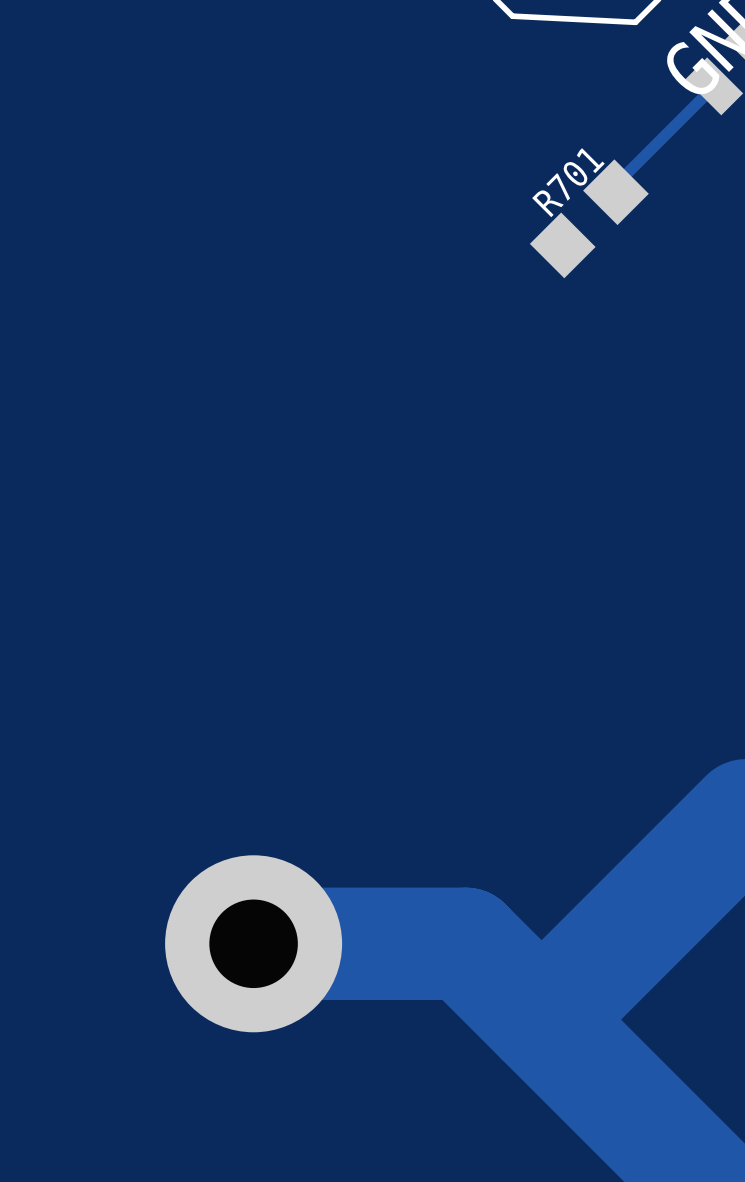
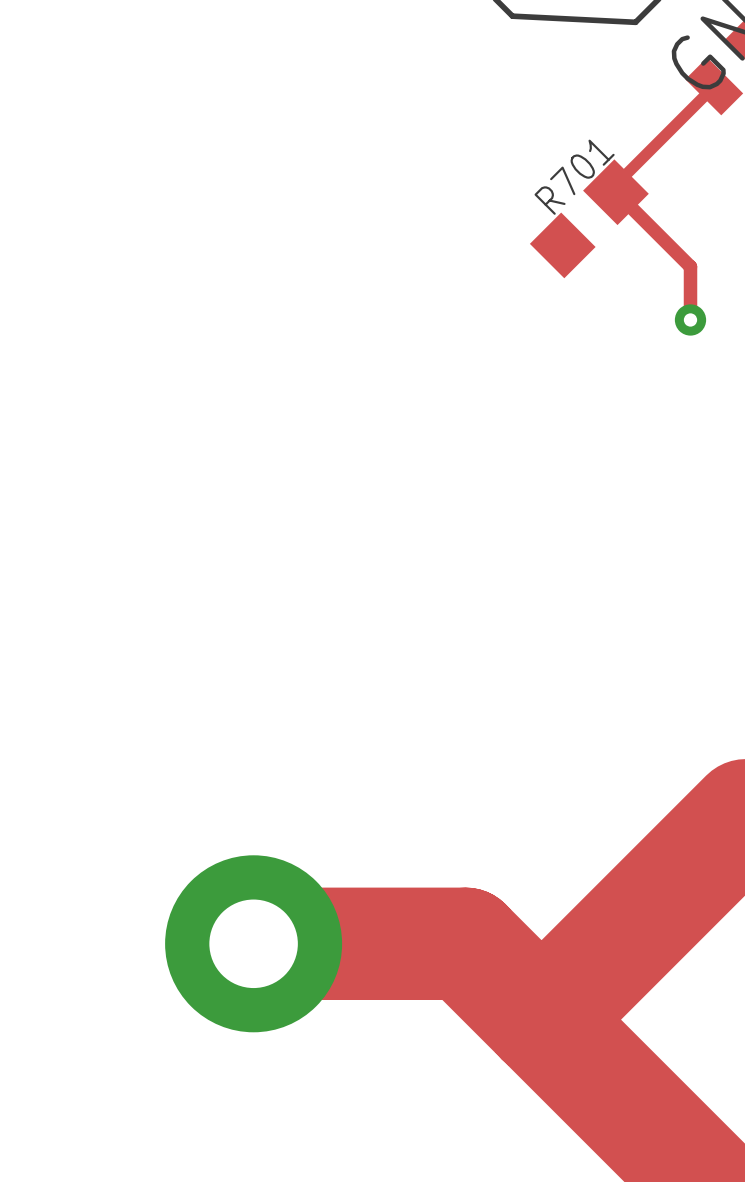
track: none -> (615, 192) (690, 266) (690, 319)
via: none -> (690, 319)

